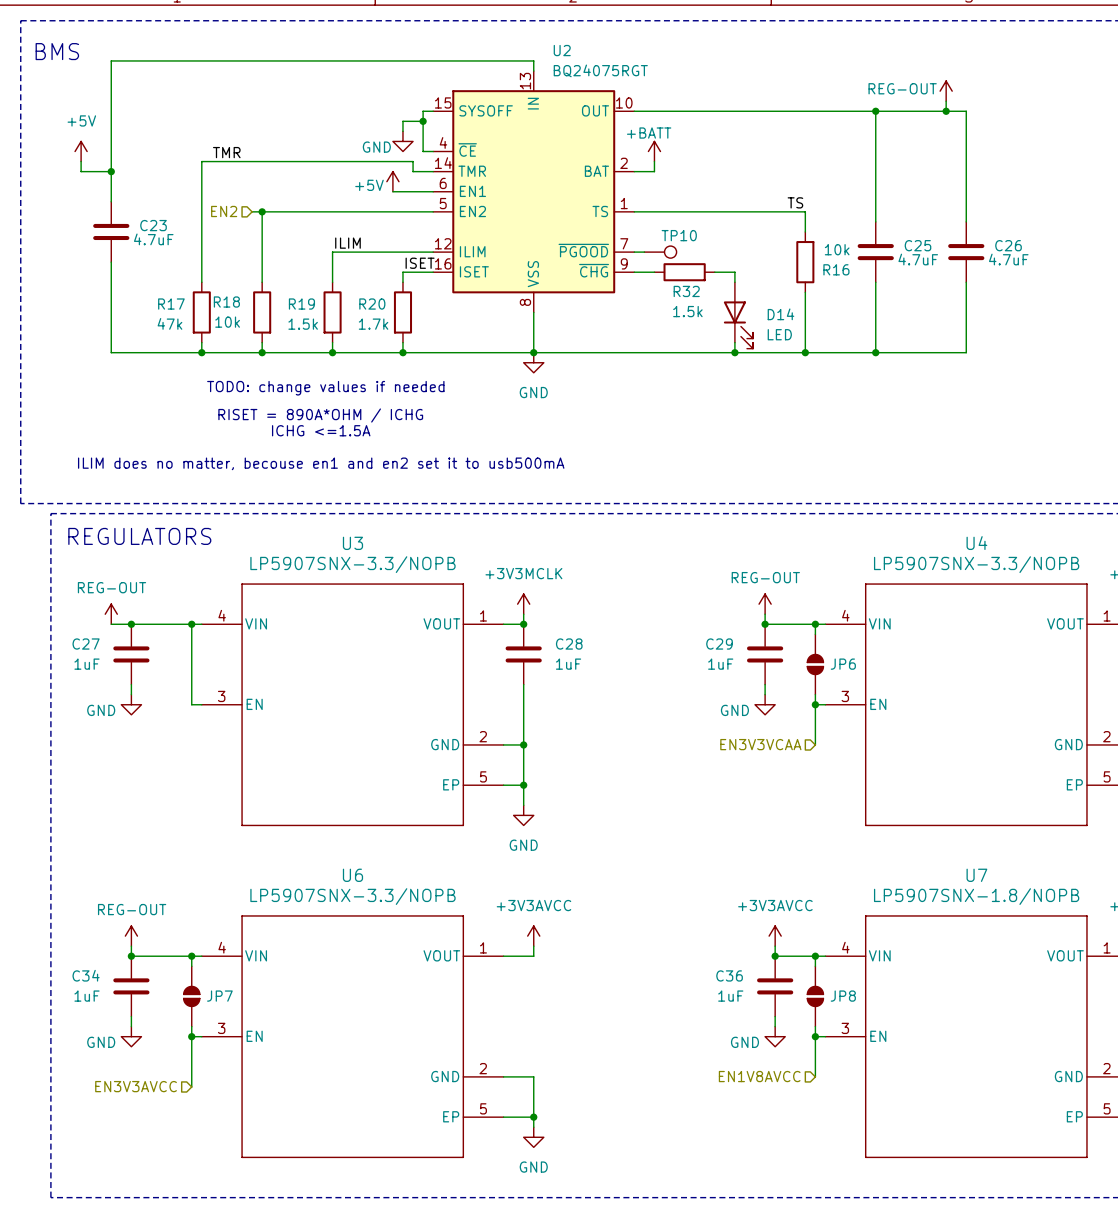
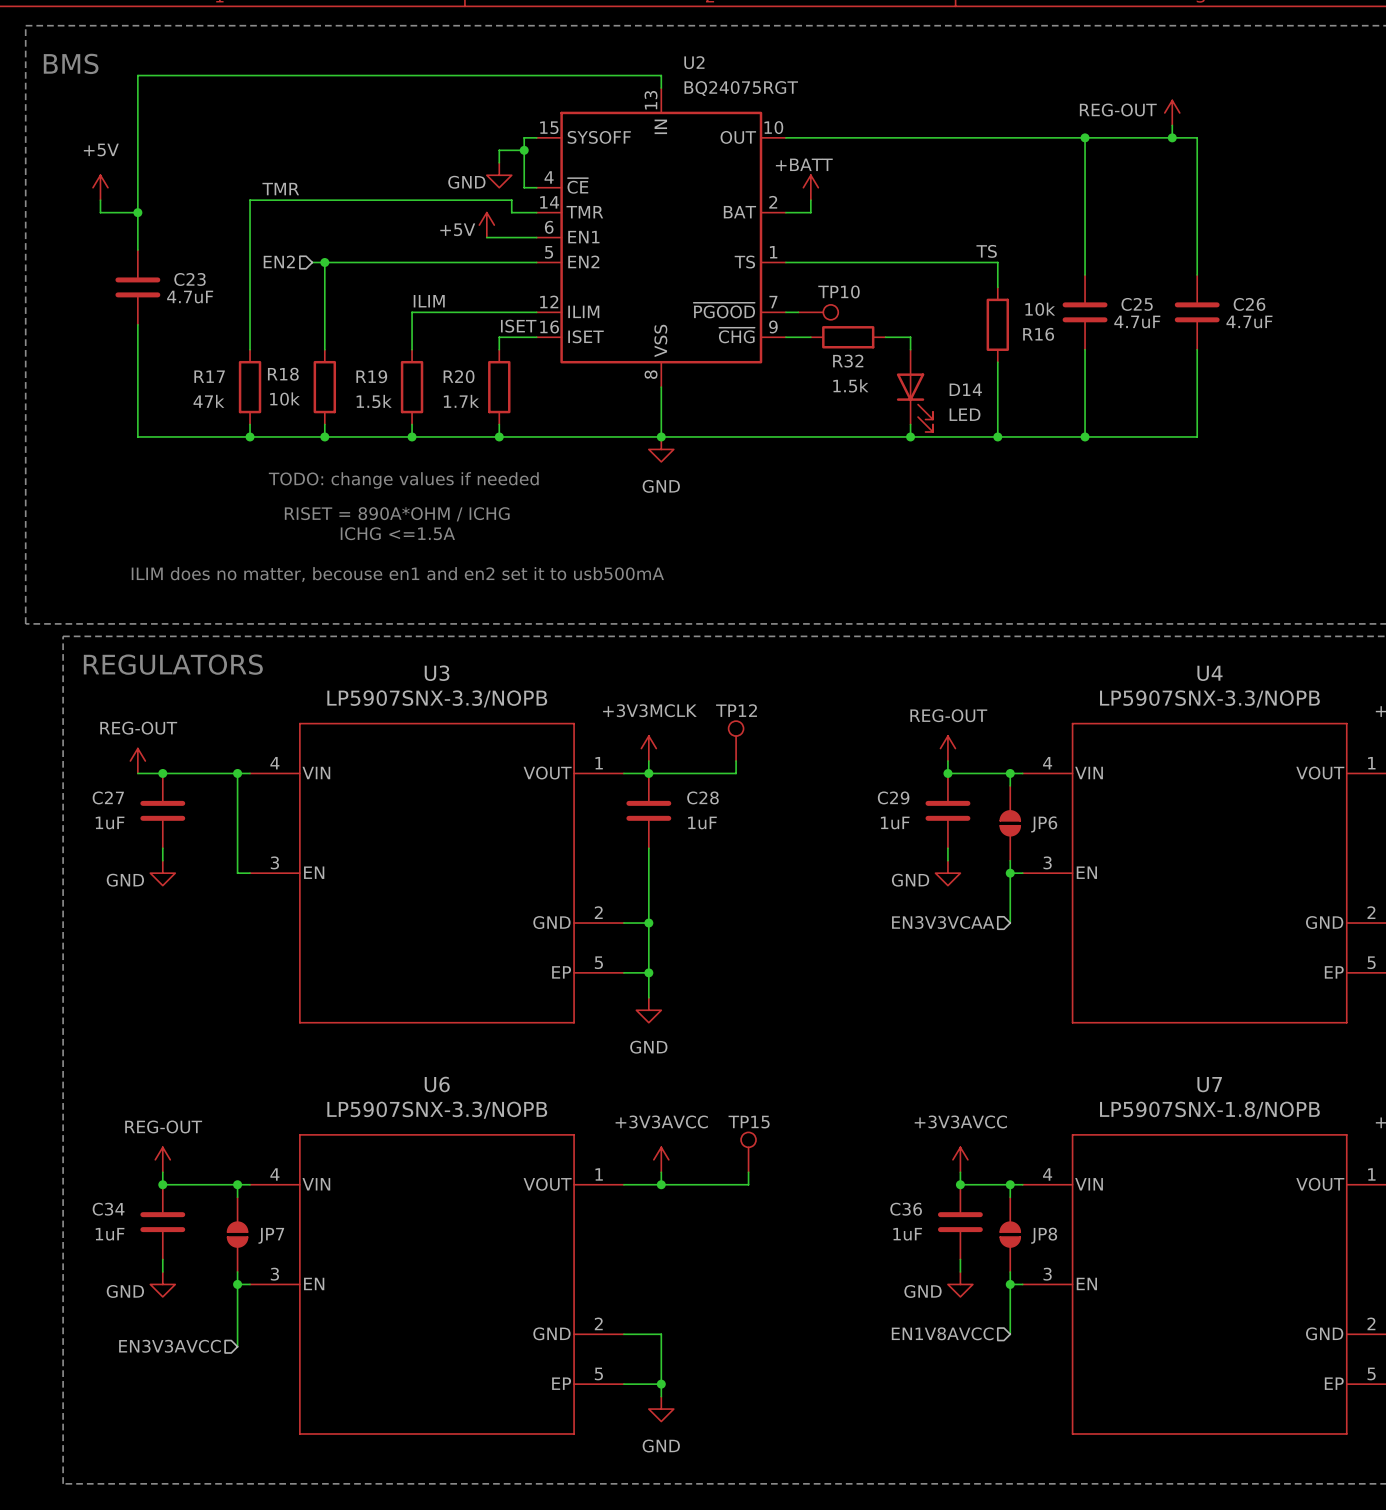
TP12: none -> (736, 741)
wire: none -> (736, 761) (736, 773) (648, 773)
TP15: none -> (748, 1152)
wire: none -> (748, 1172) (748, 1184) (661, 1184)
junction: none -> (661, 1184)

